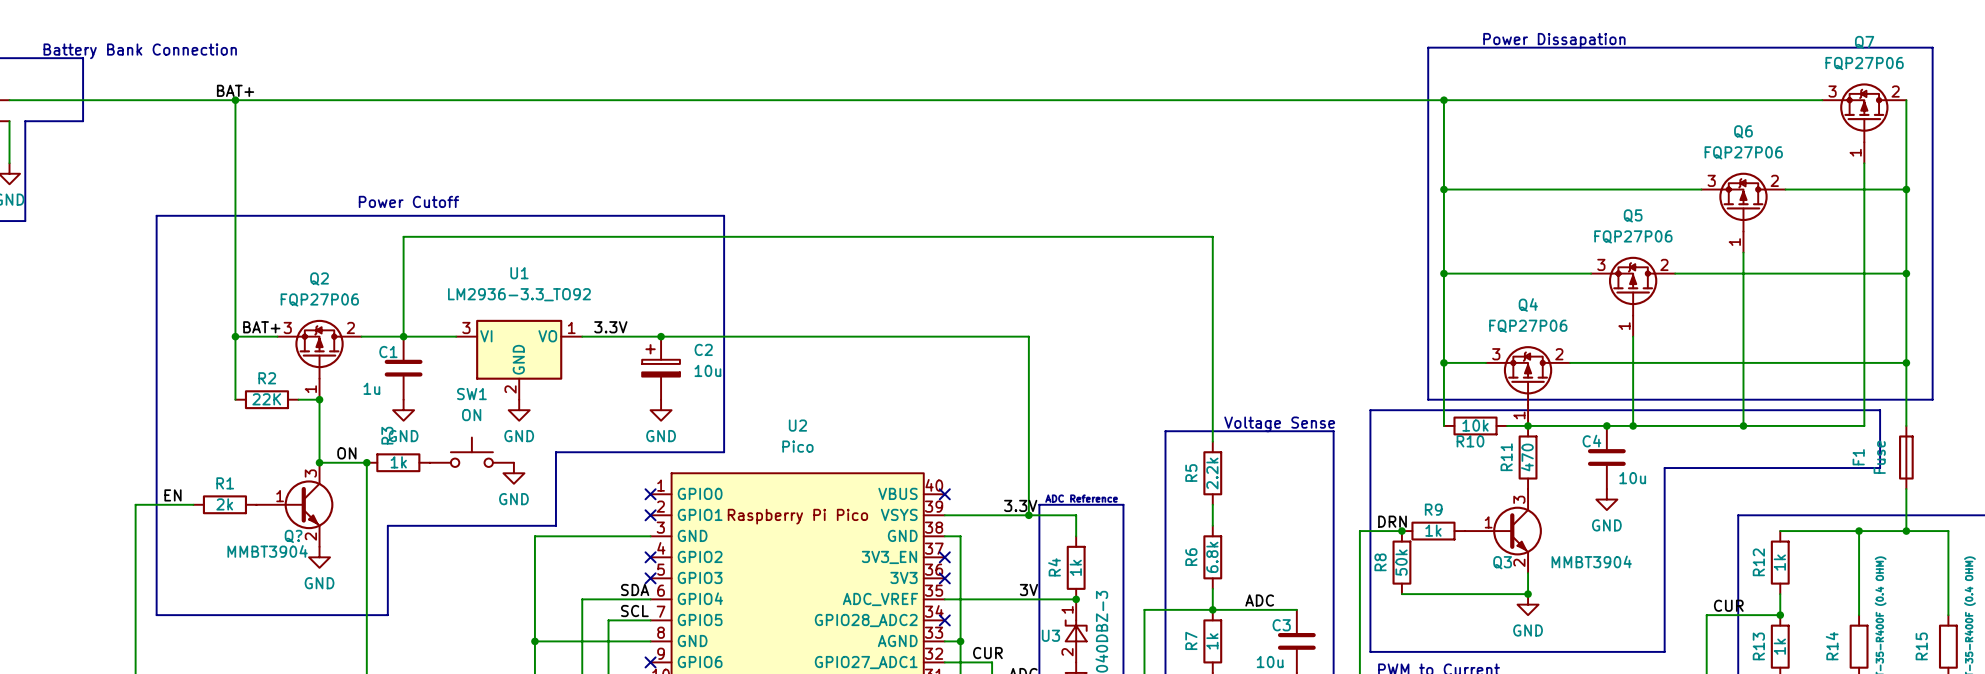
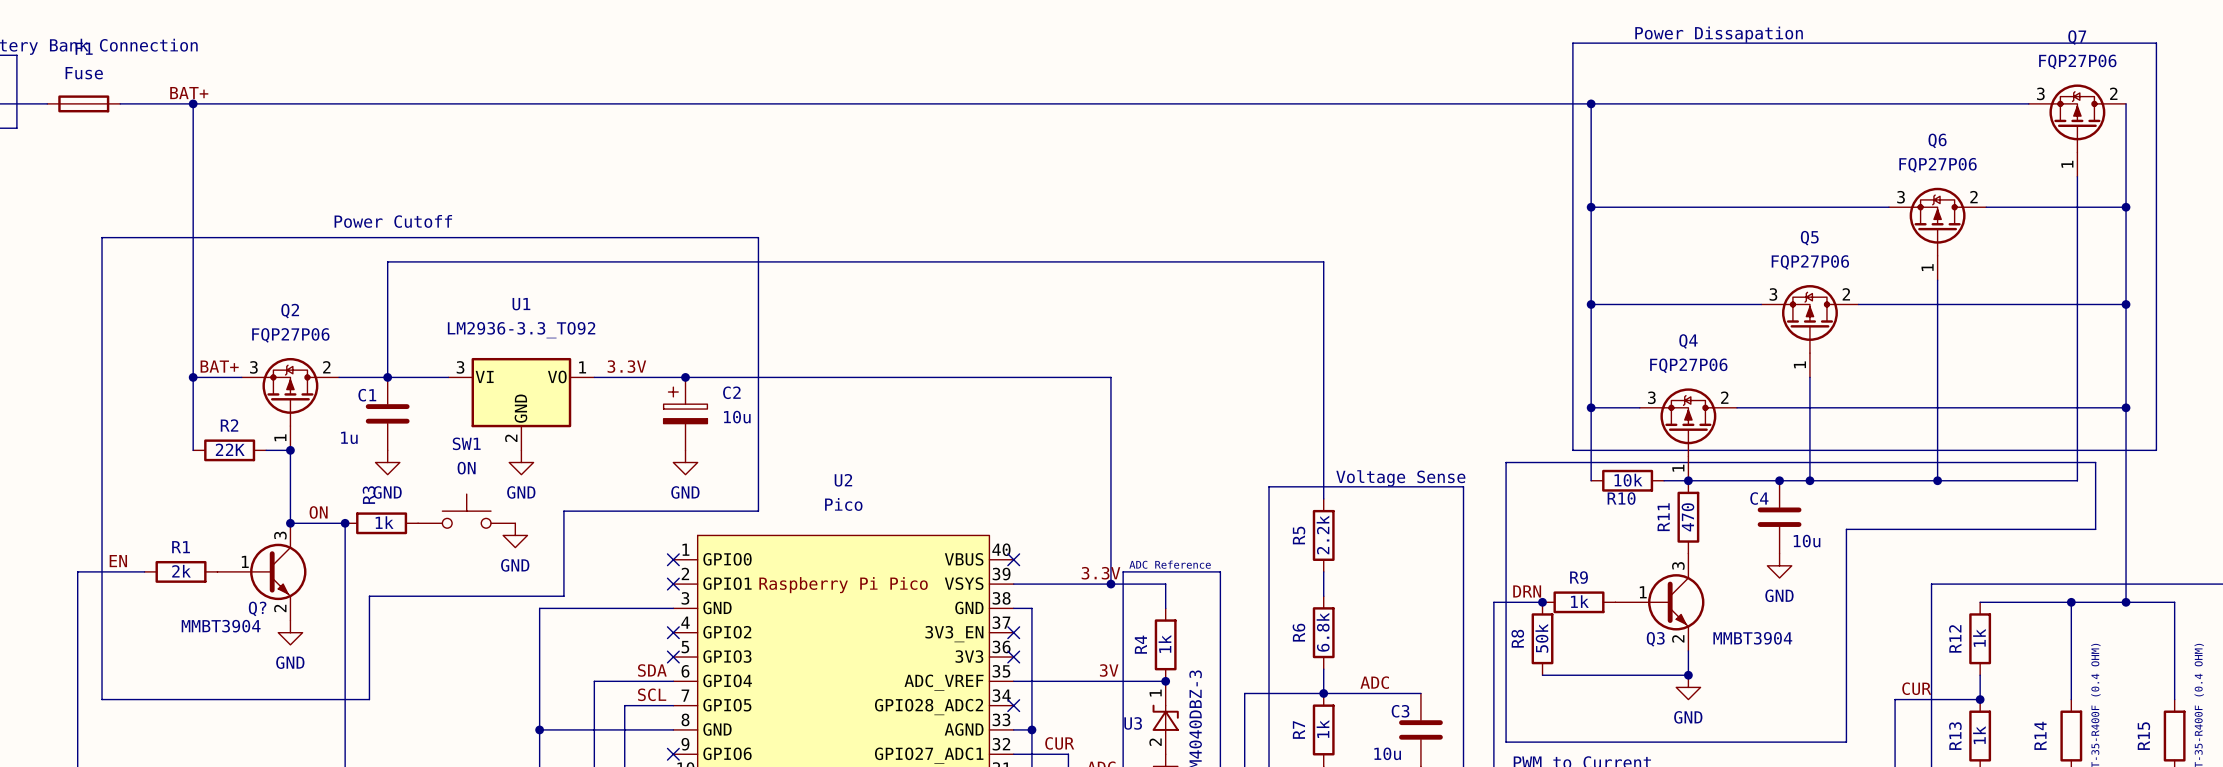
F1 rotation: 0° (1906, 457) -> 90° clockwise (83, 103)
F1 position: (1906, 457) -> (83, 103)

